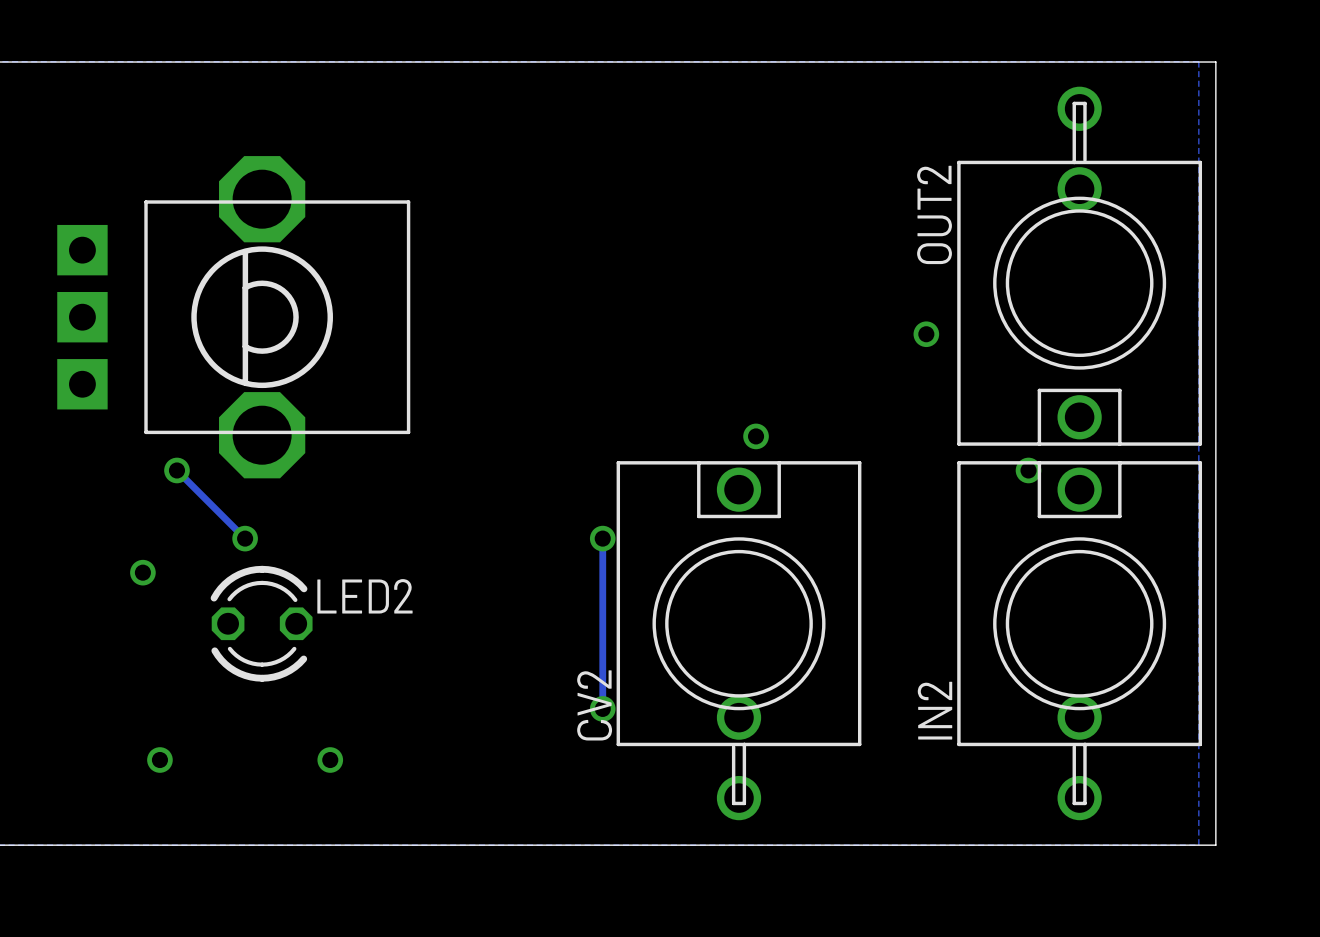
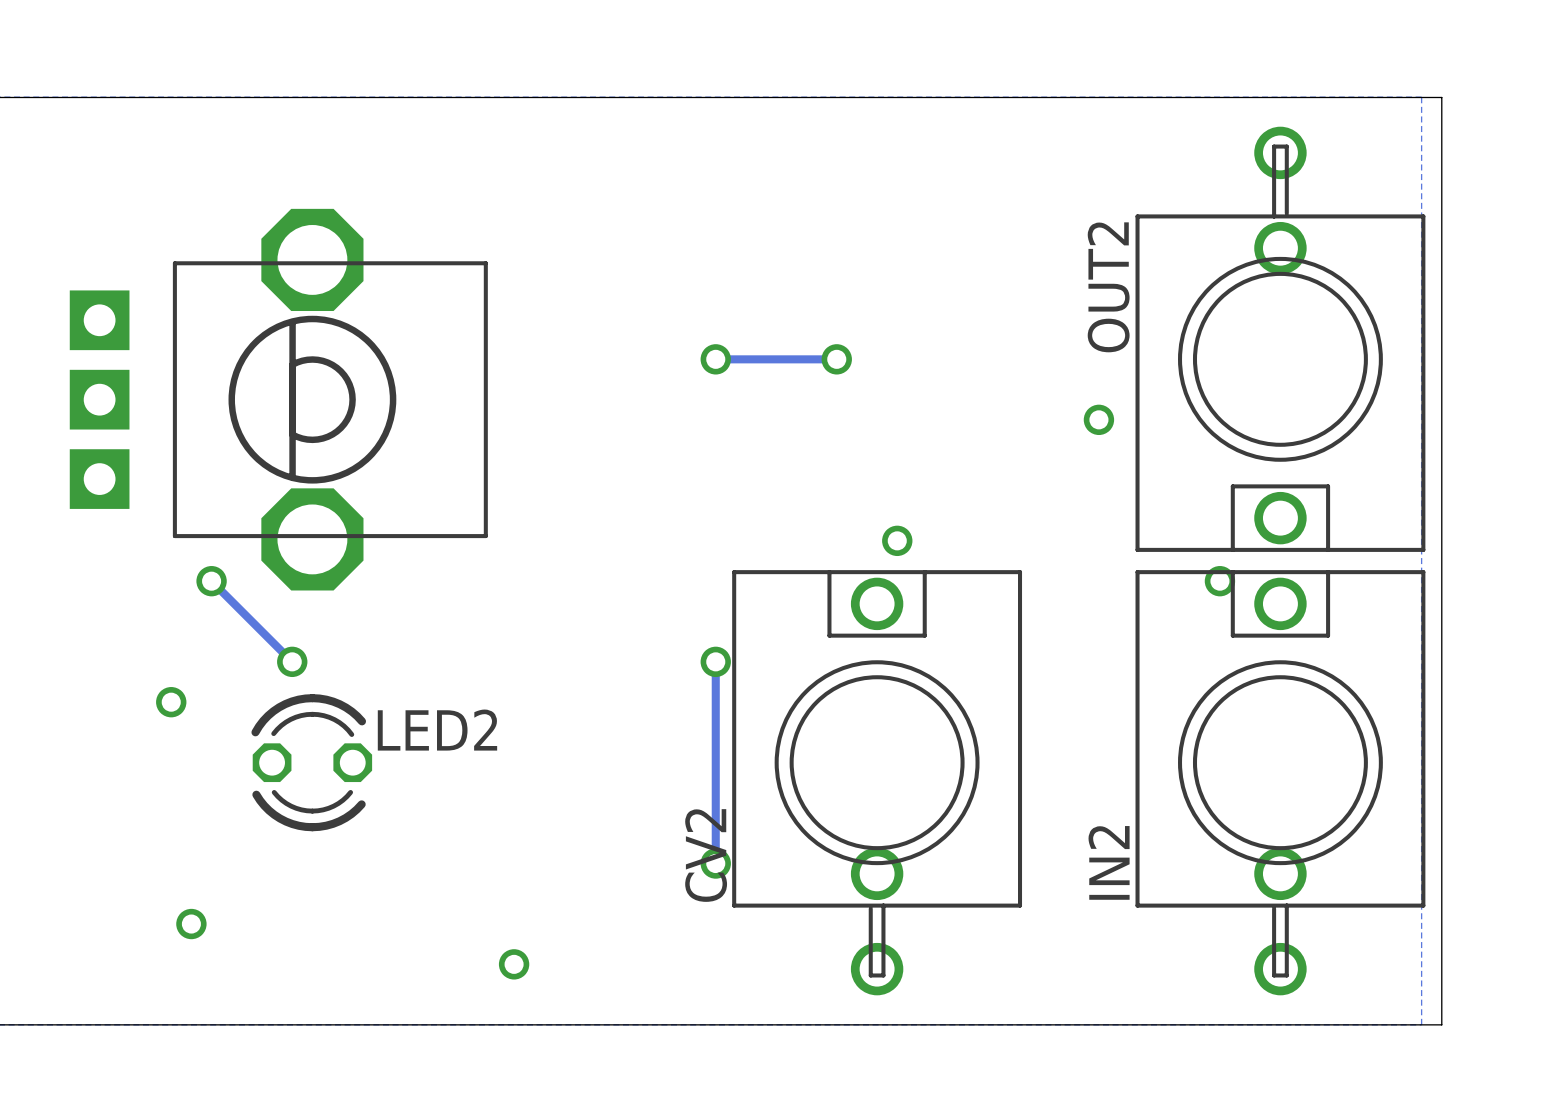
via: none -> (715, 359)
track: none -> (836, 359) (715, 359)
via: none -> (836, 359)
via position: (330, 760) -> (514, 964)

